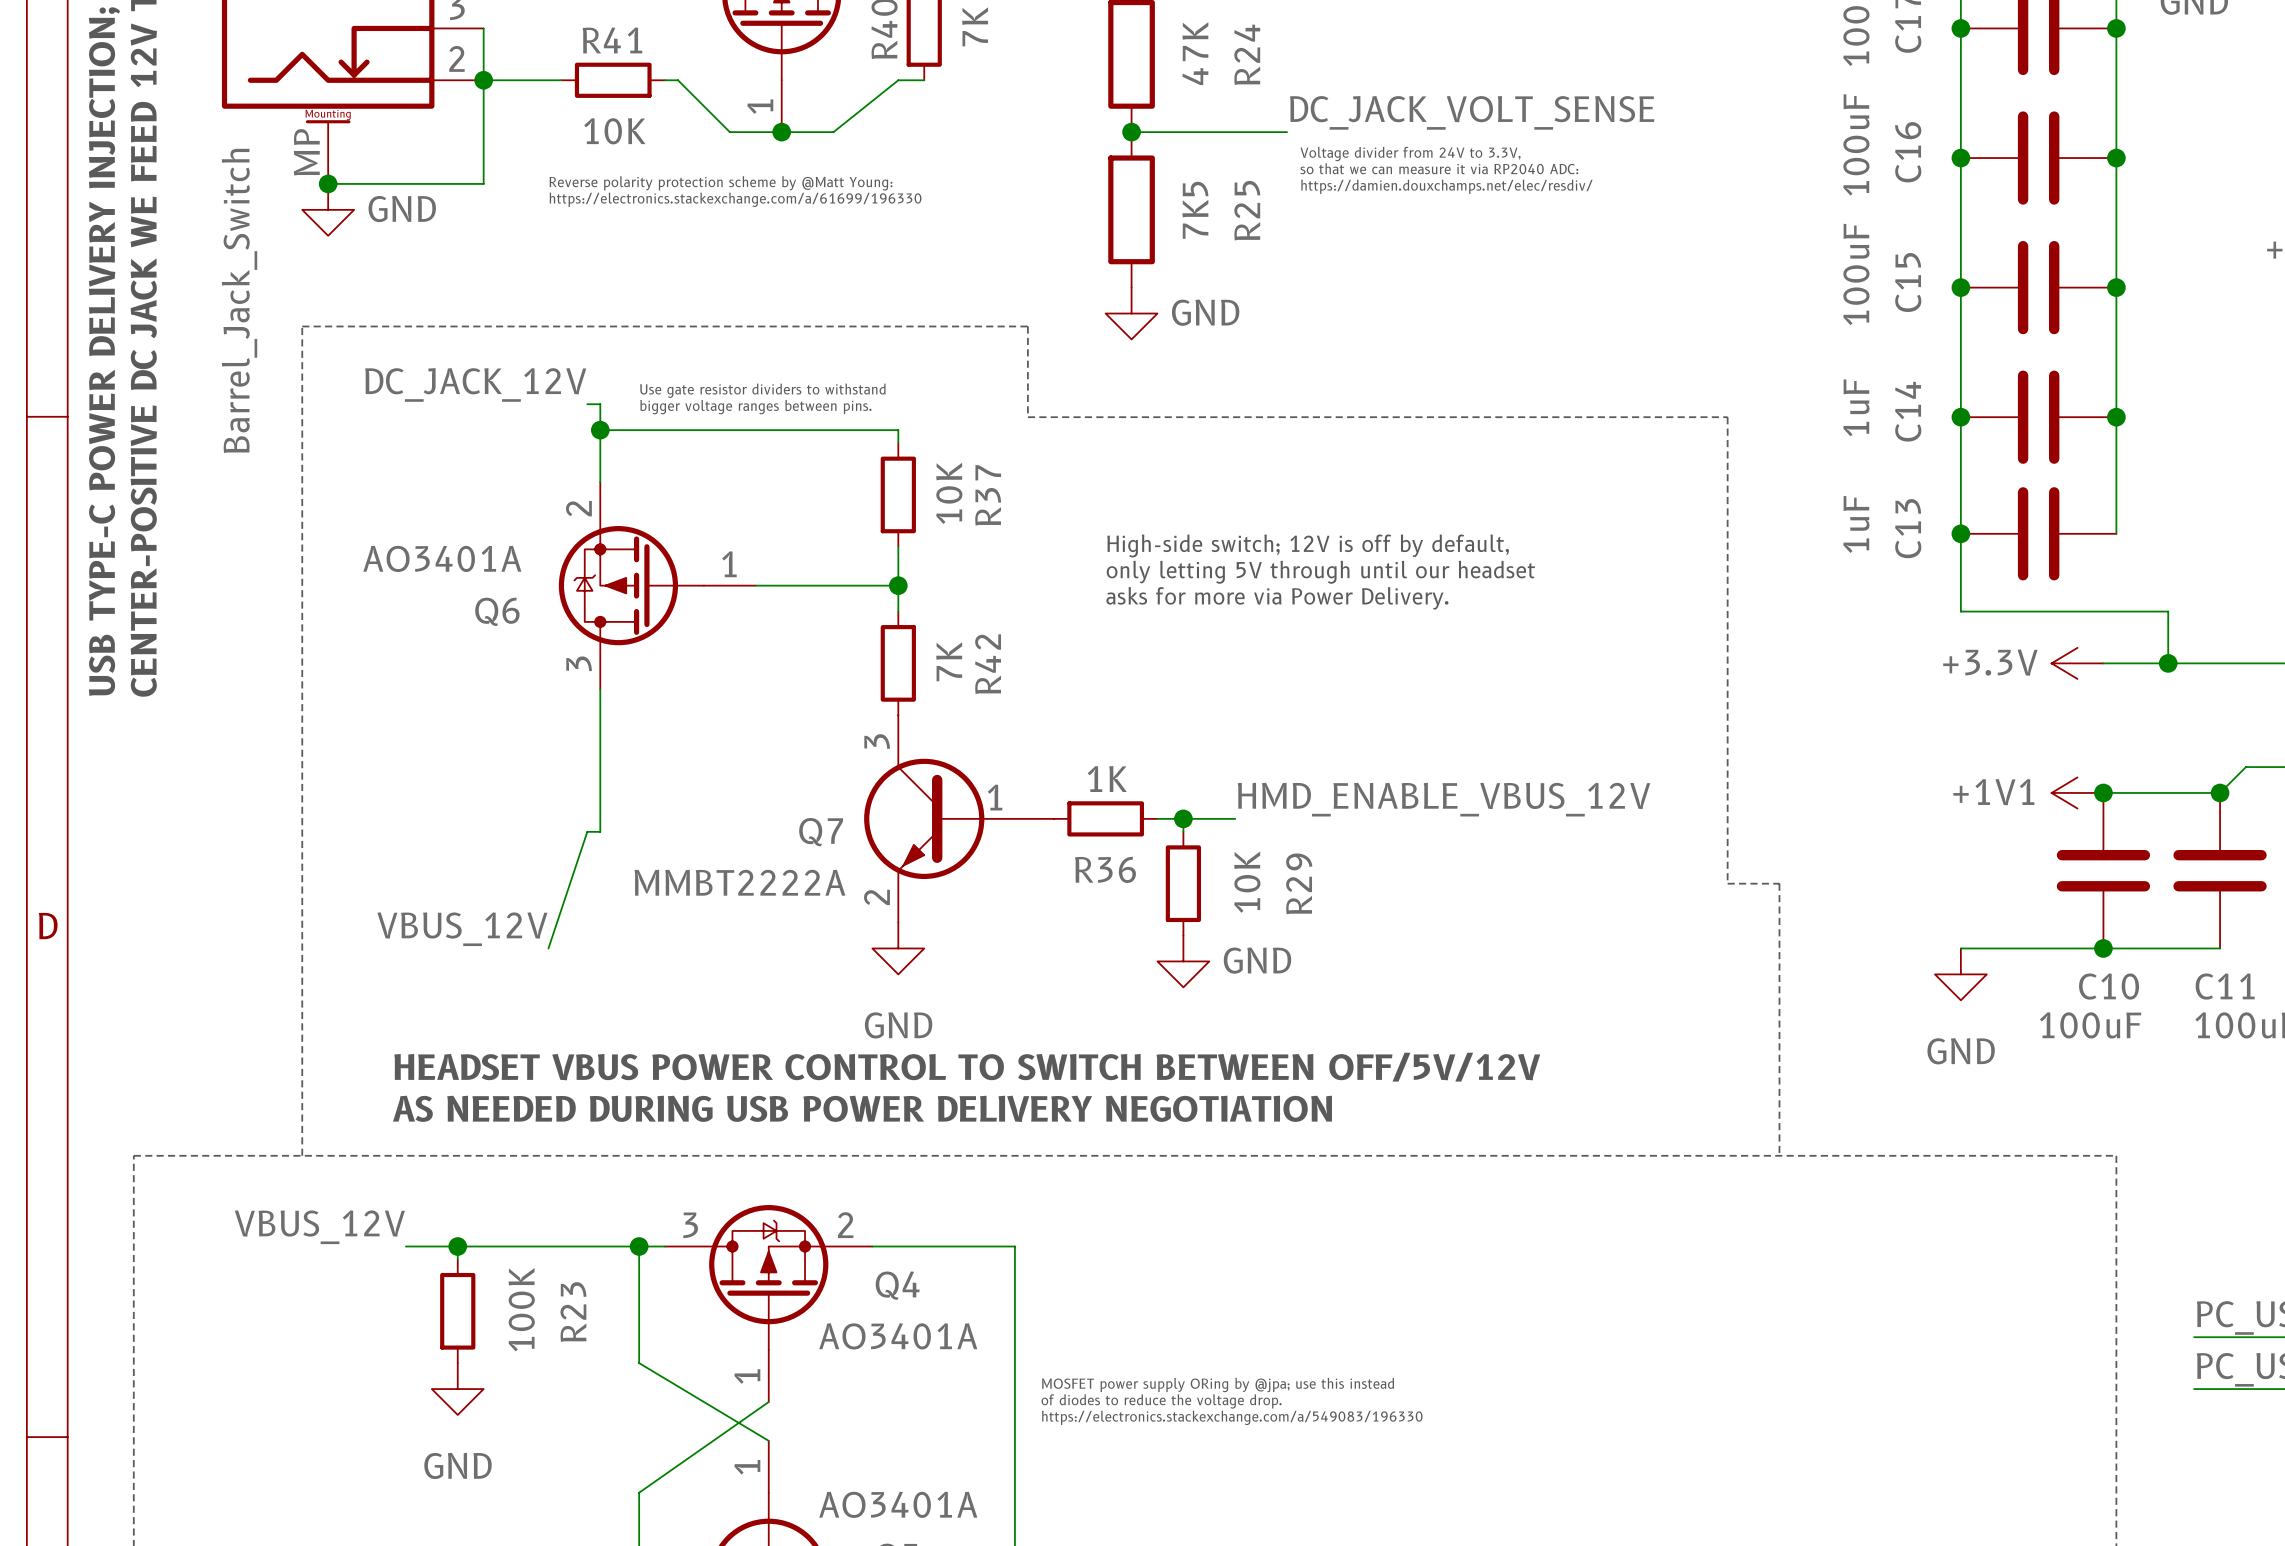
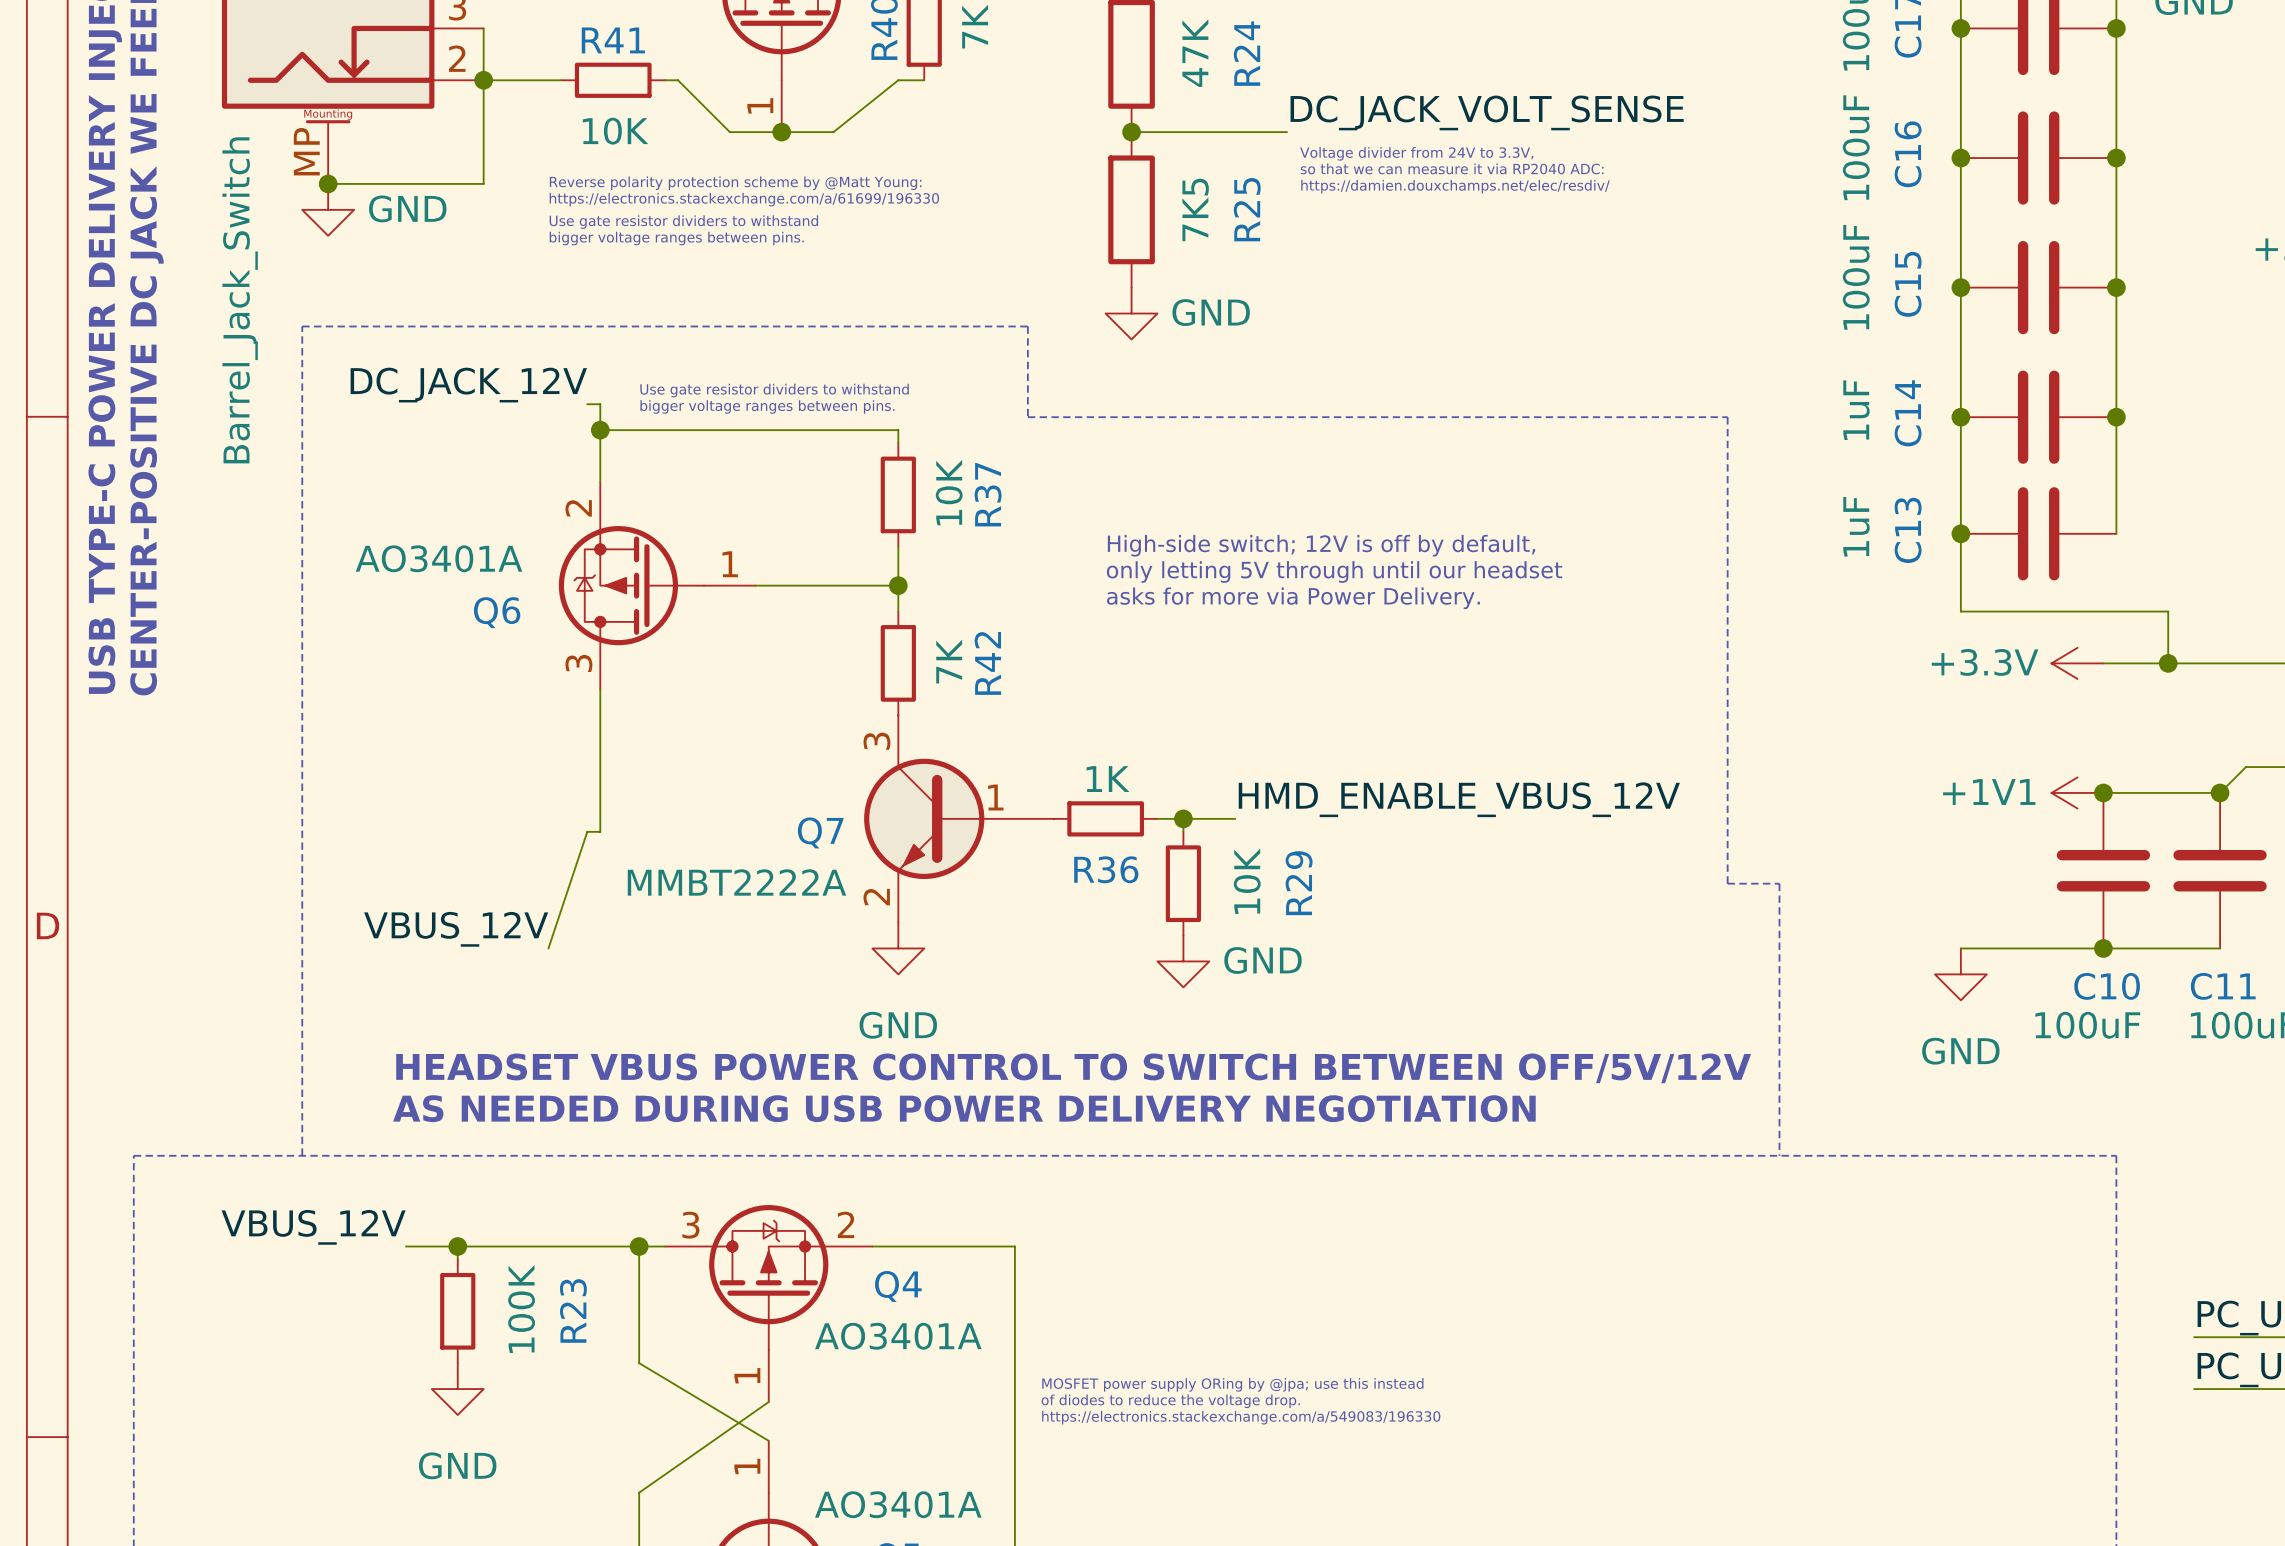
text: none -> Use gate resistor dividers to withstand (683, 222)
text: none -> bigger voltage ranges between pins. (676, 238)

